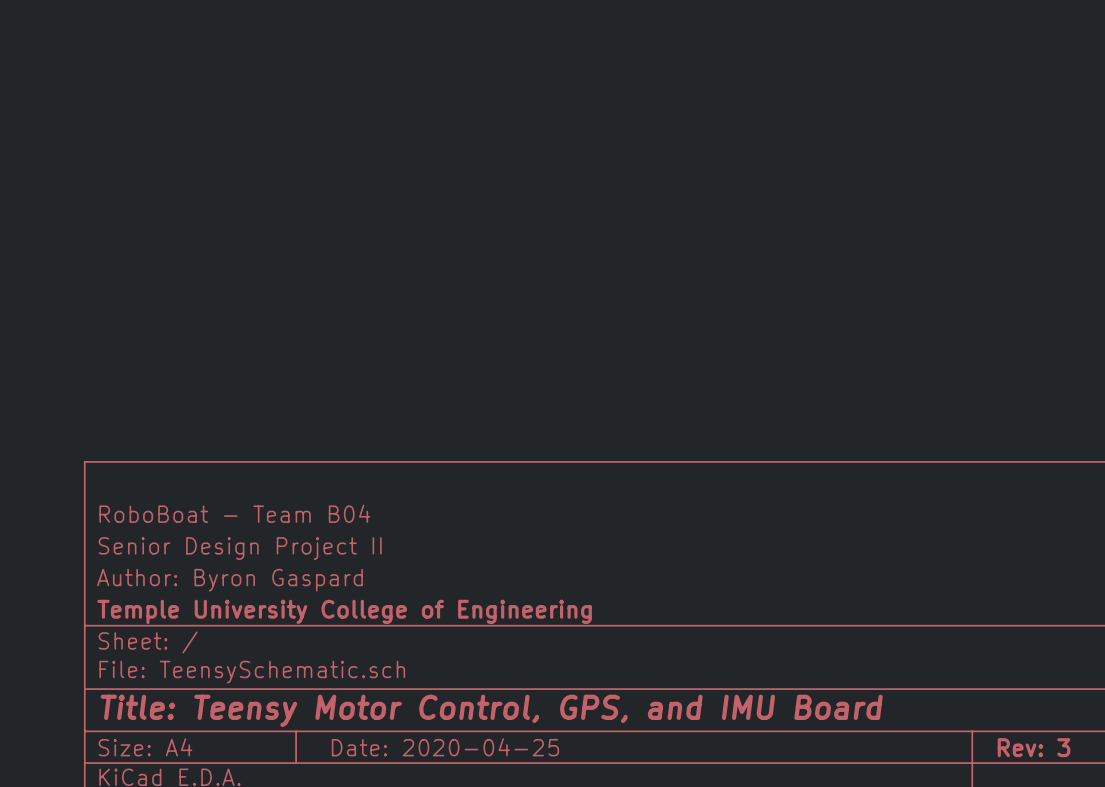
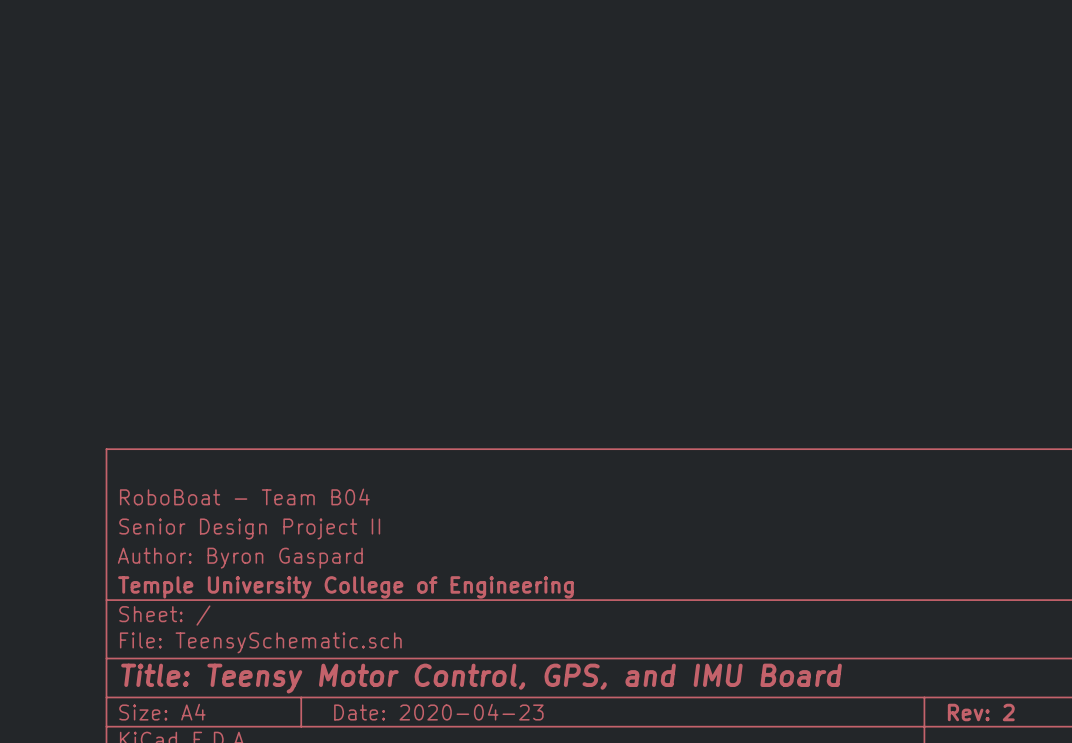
title block: Date: 2020-04-25 (445, 747) -> Date: 2020-04-23 (438, 712)
title block: Rev: 3 (1034, 747) -> Rev: 2 (981, 712)

